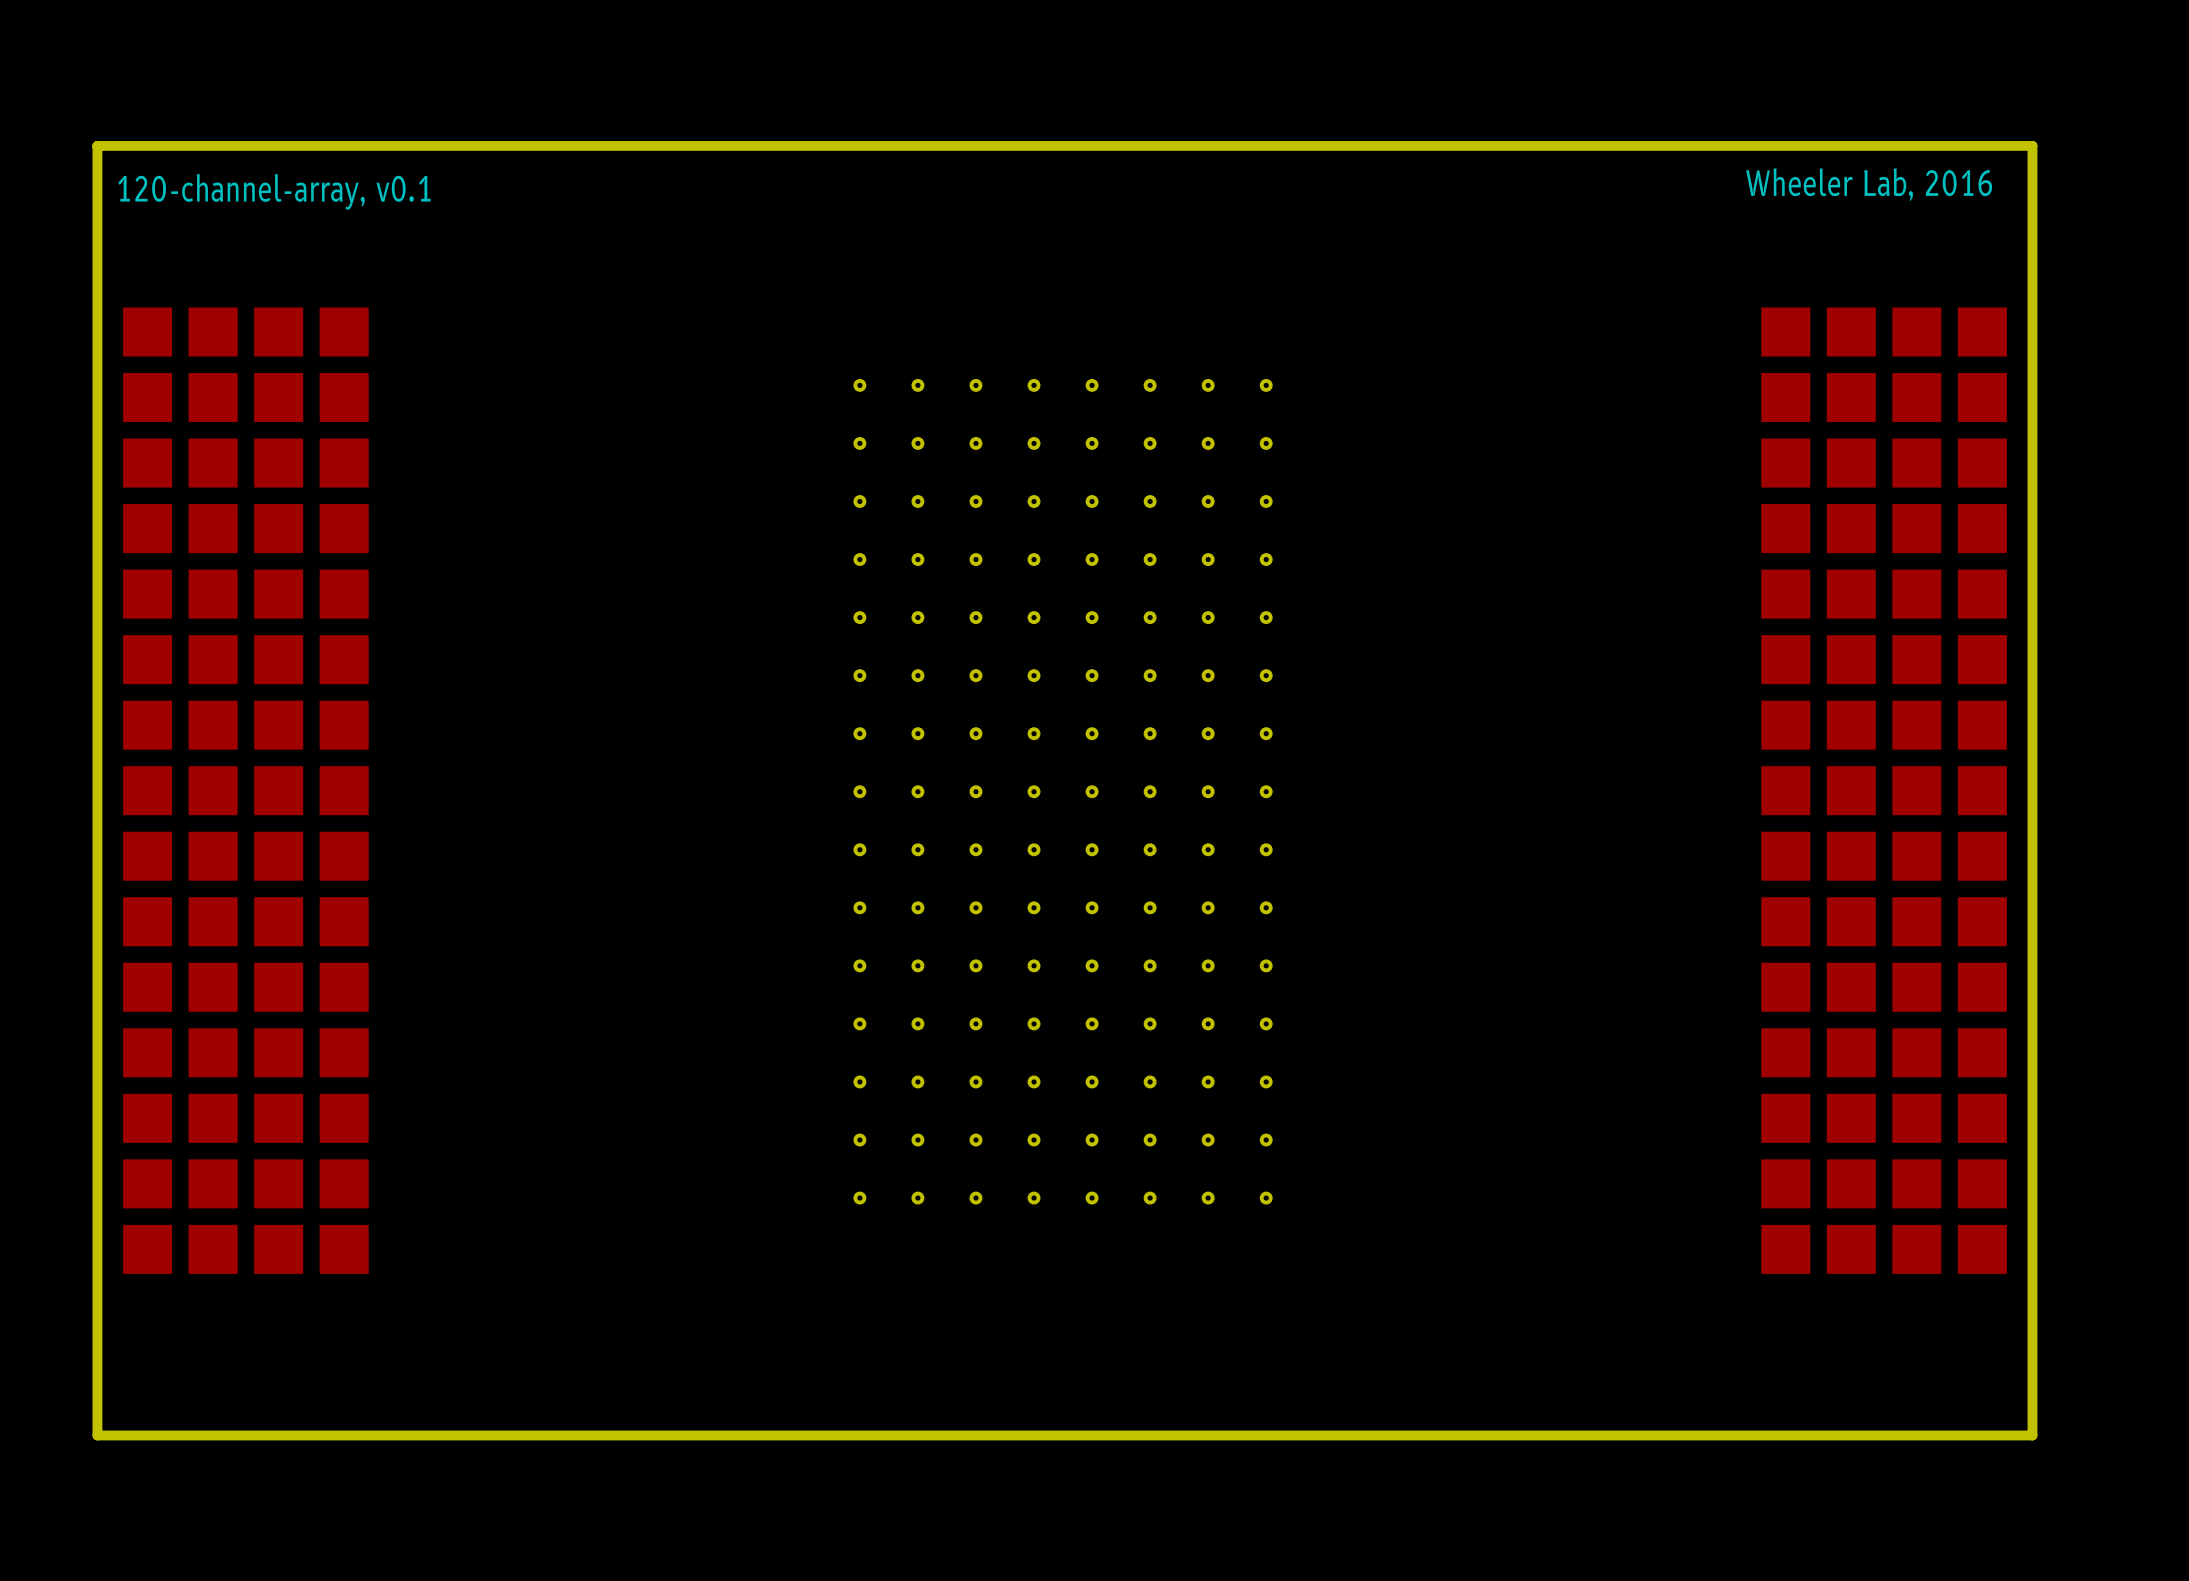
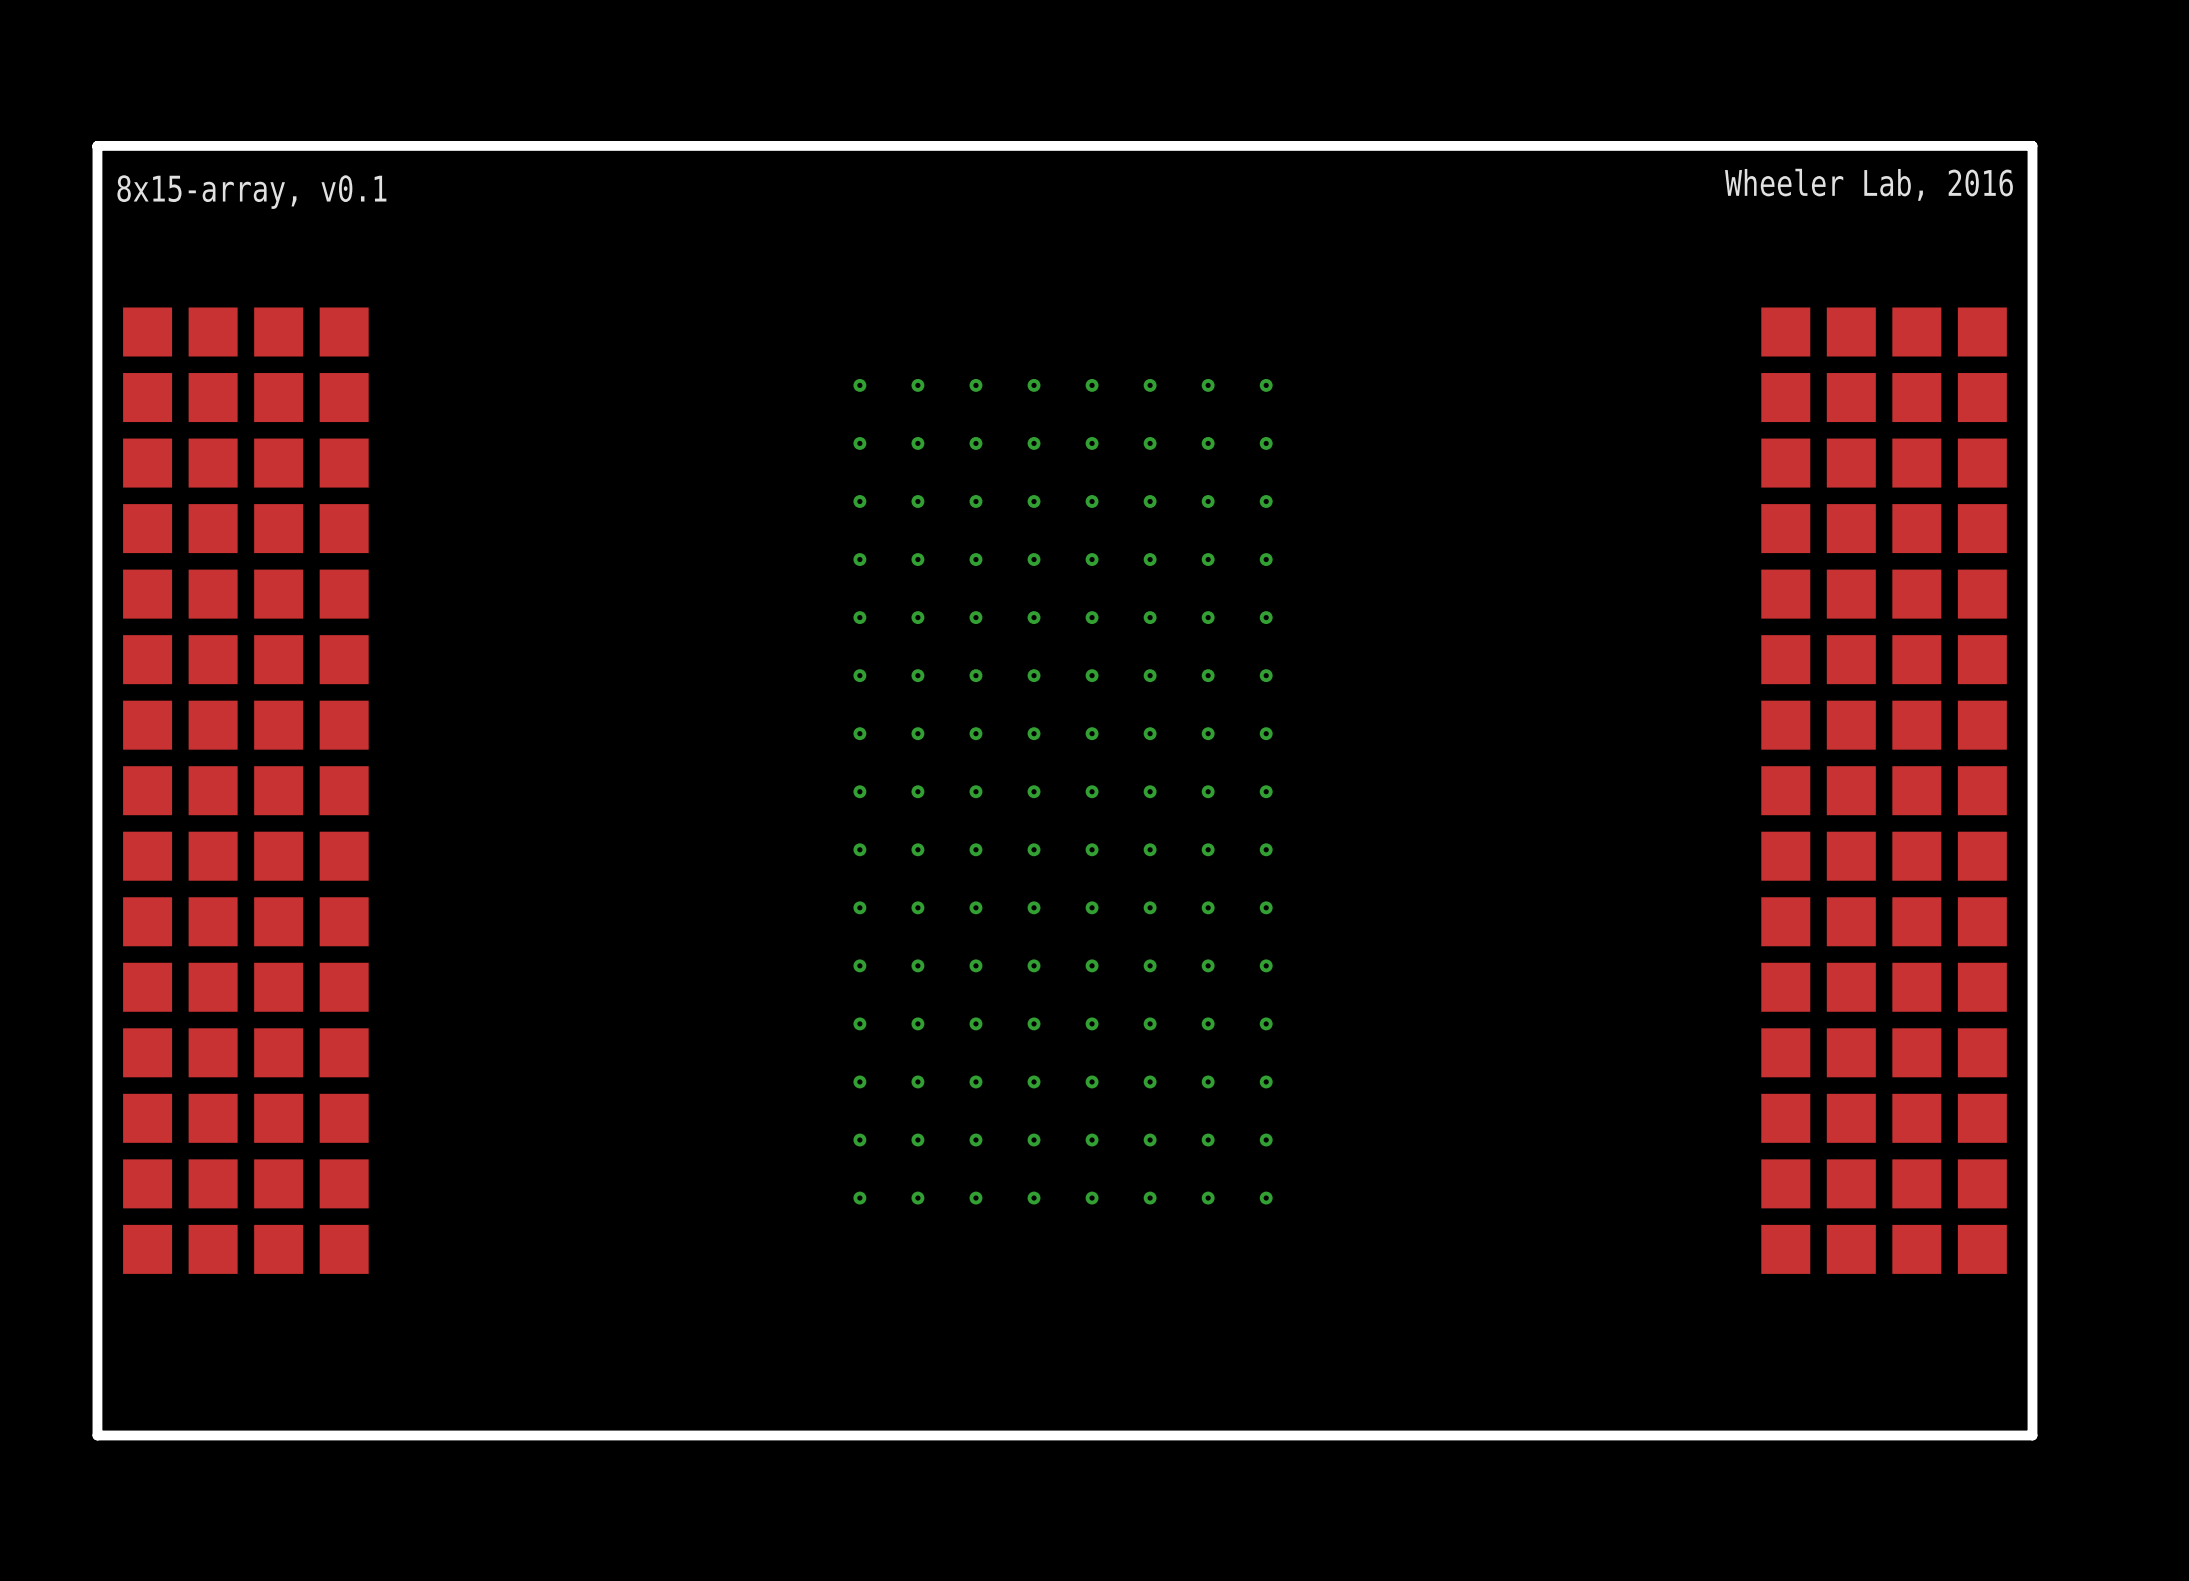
text: 120-channel-array, v0.1 (274, 191) -> 8x15-array, v0.1 (251, 192)

